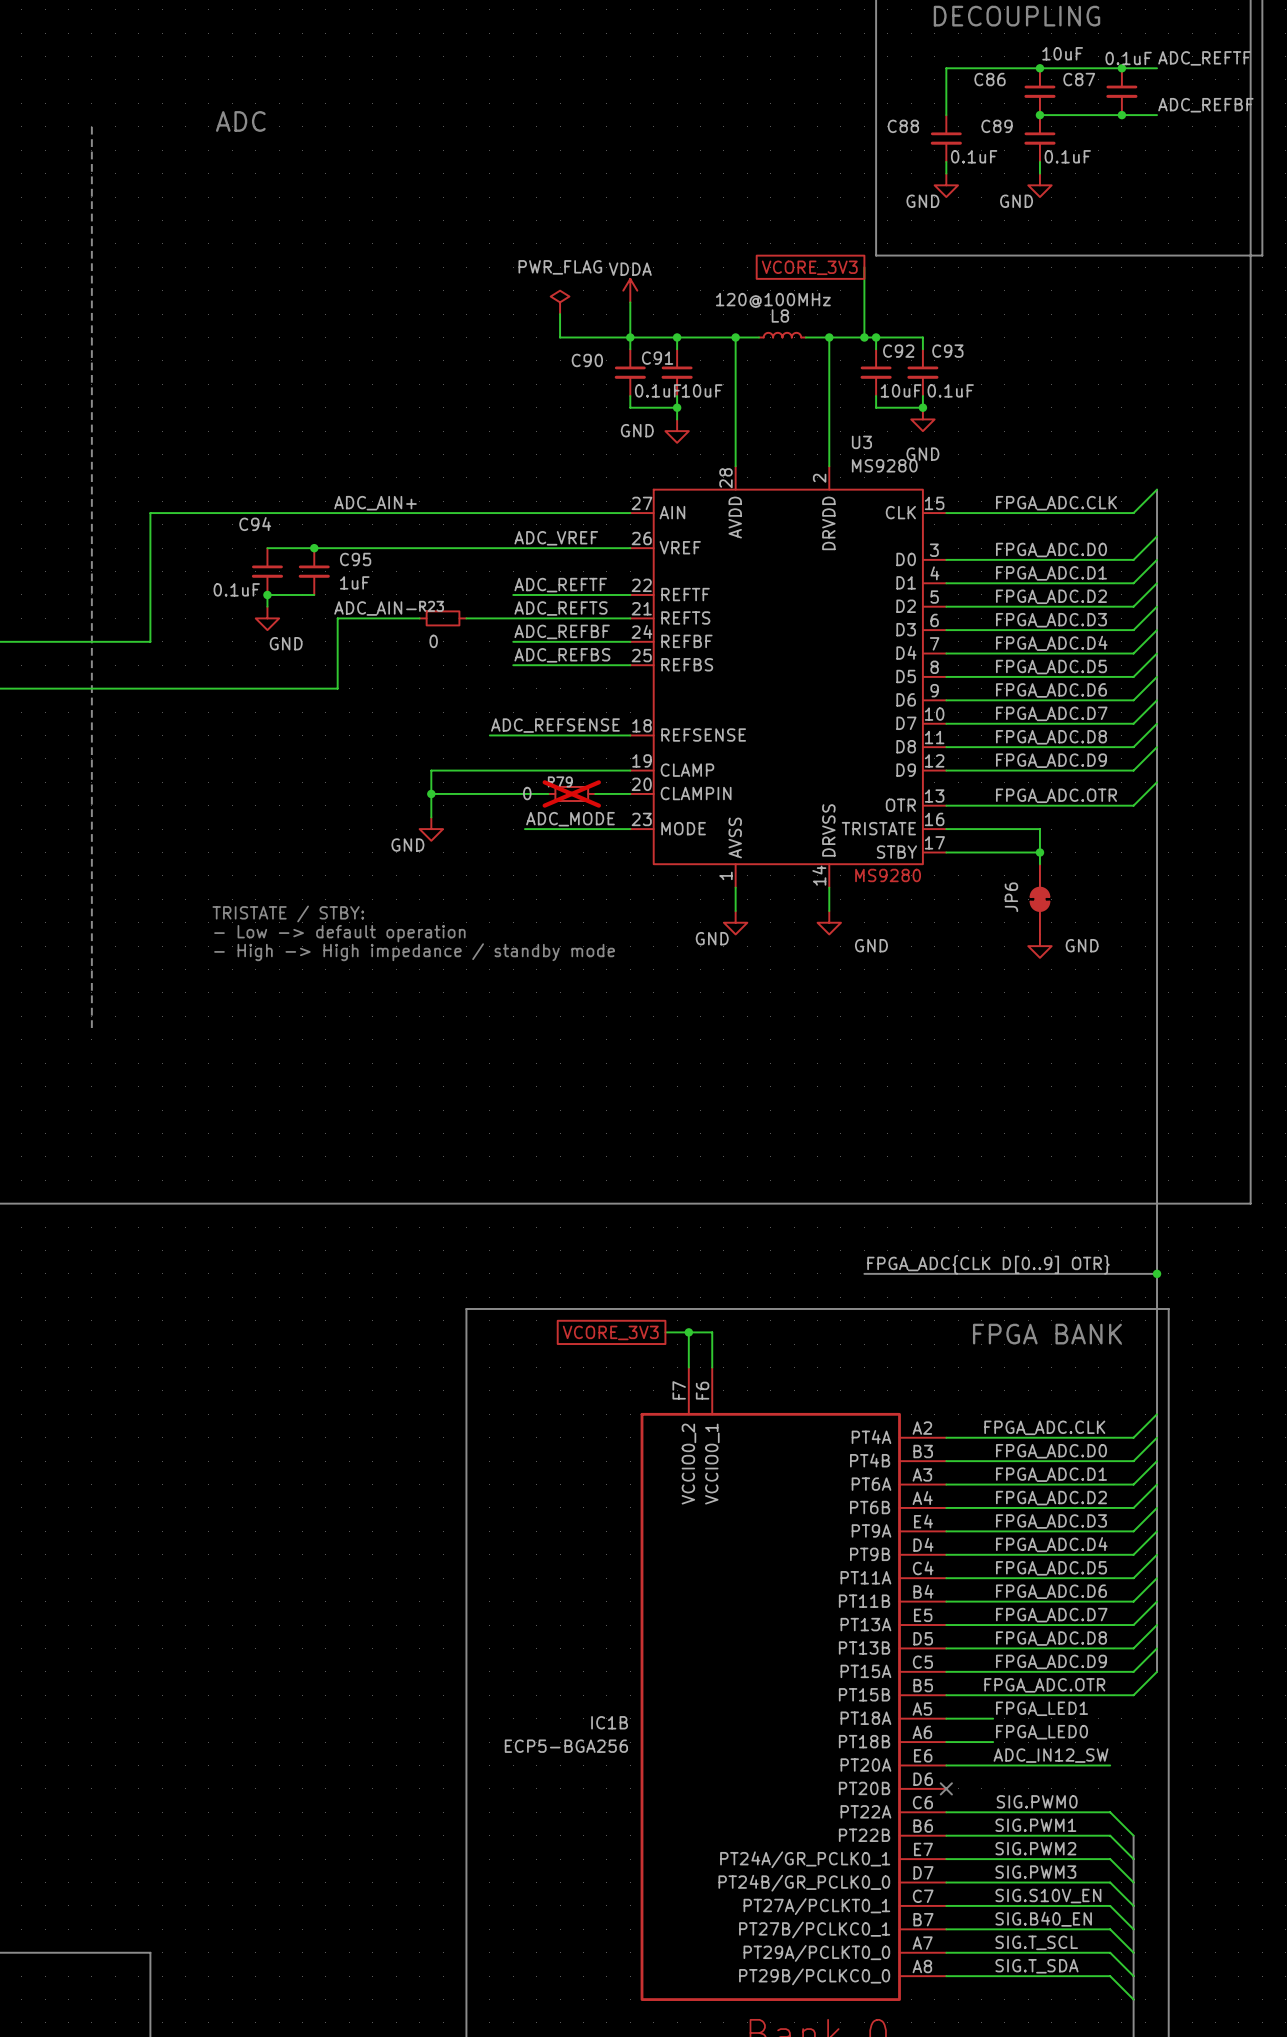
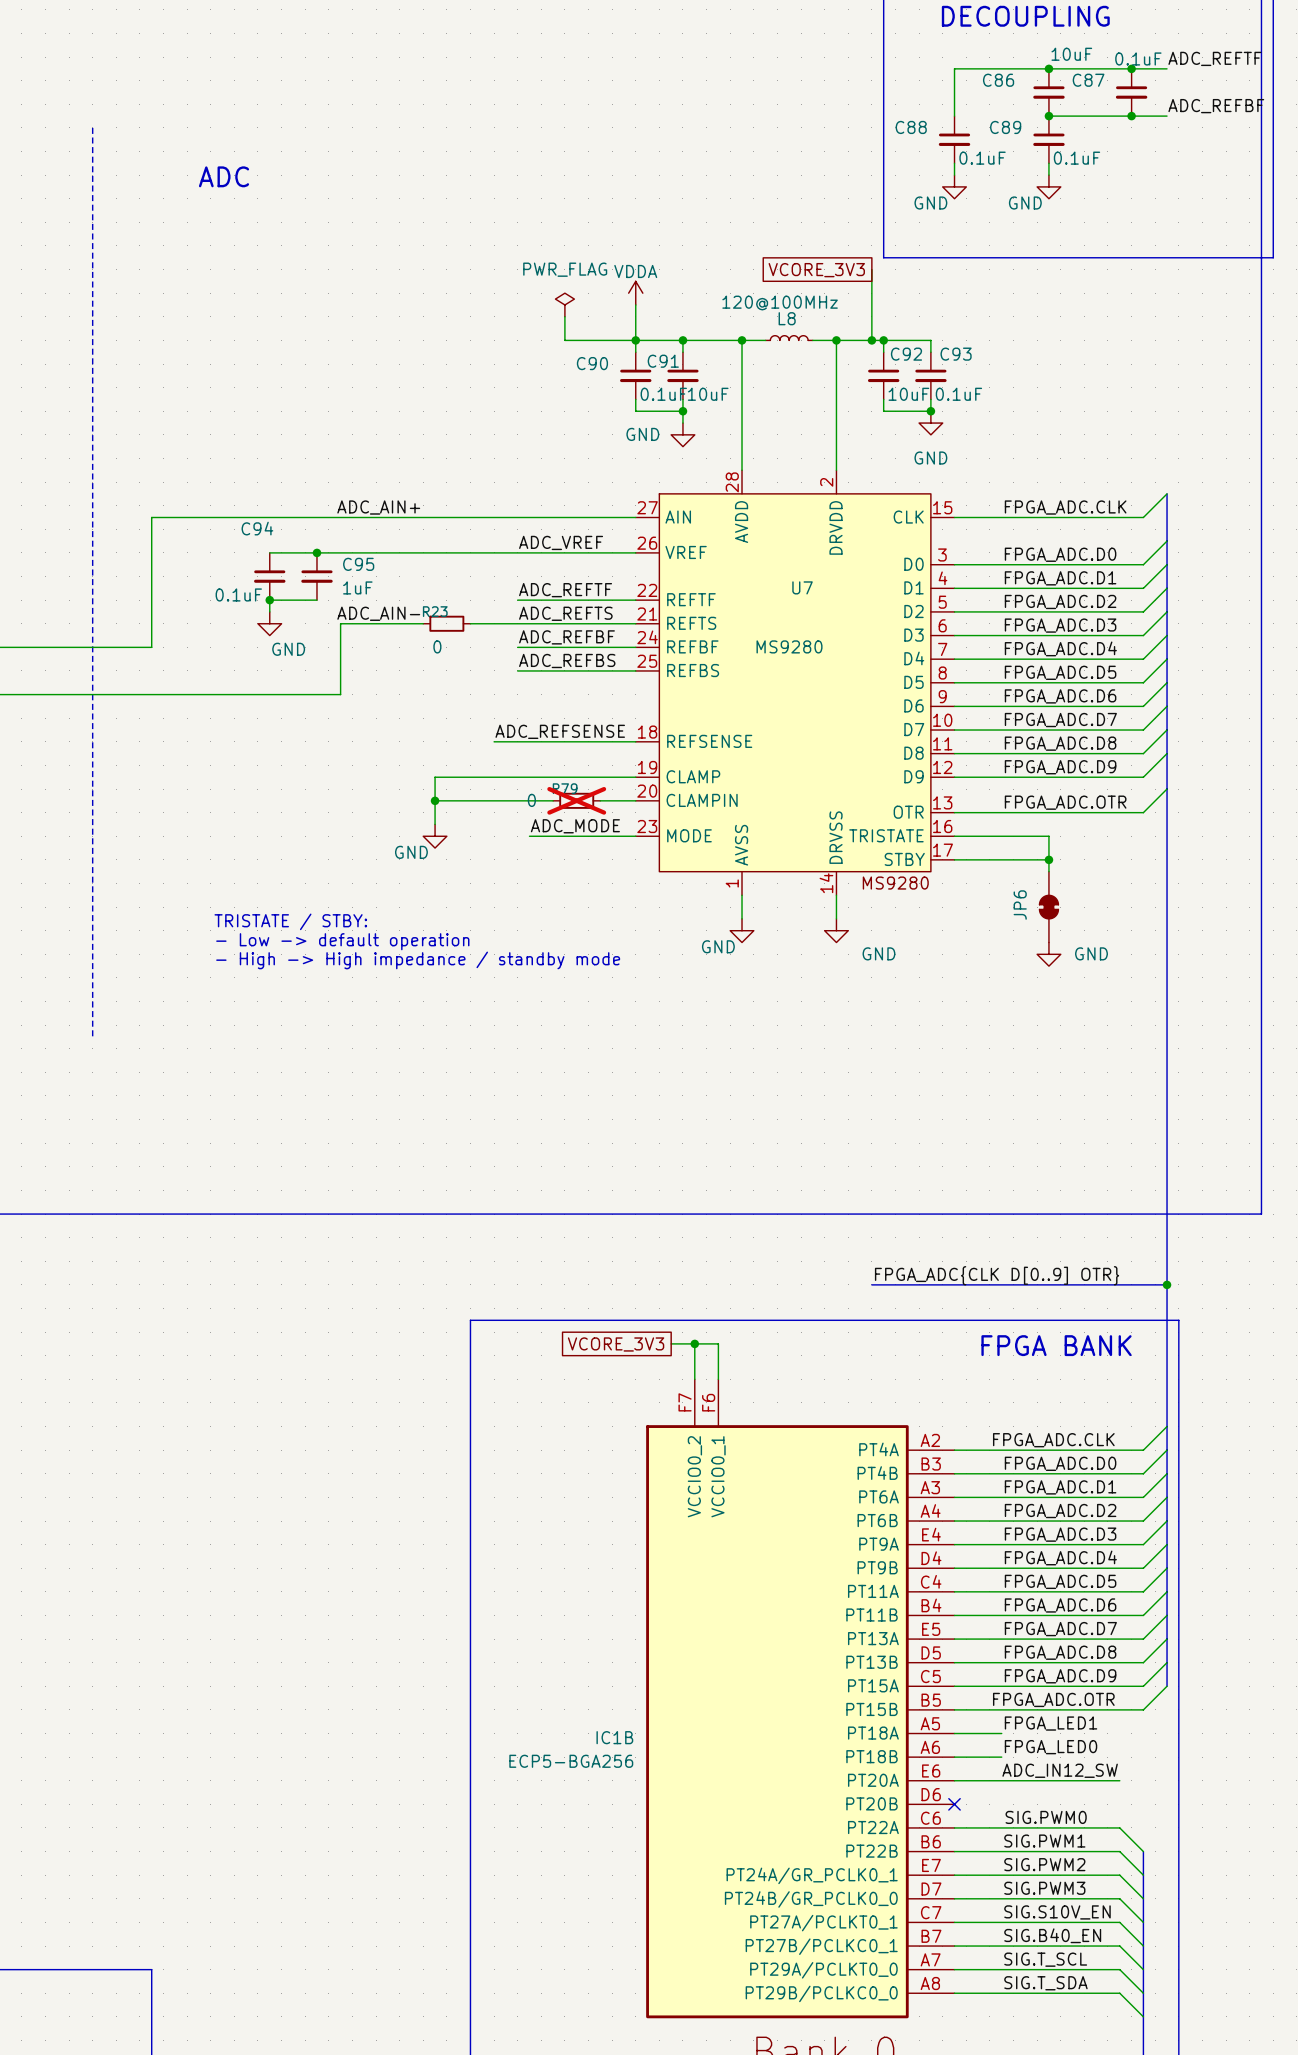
text position: ADC (240, 121) -> ADC (224, 176)
U3 name: U3 (861, 442) -> U7 (802, 587)
U3 value position: MS9280 (884, 465) -> MS9280 (789, 646)

